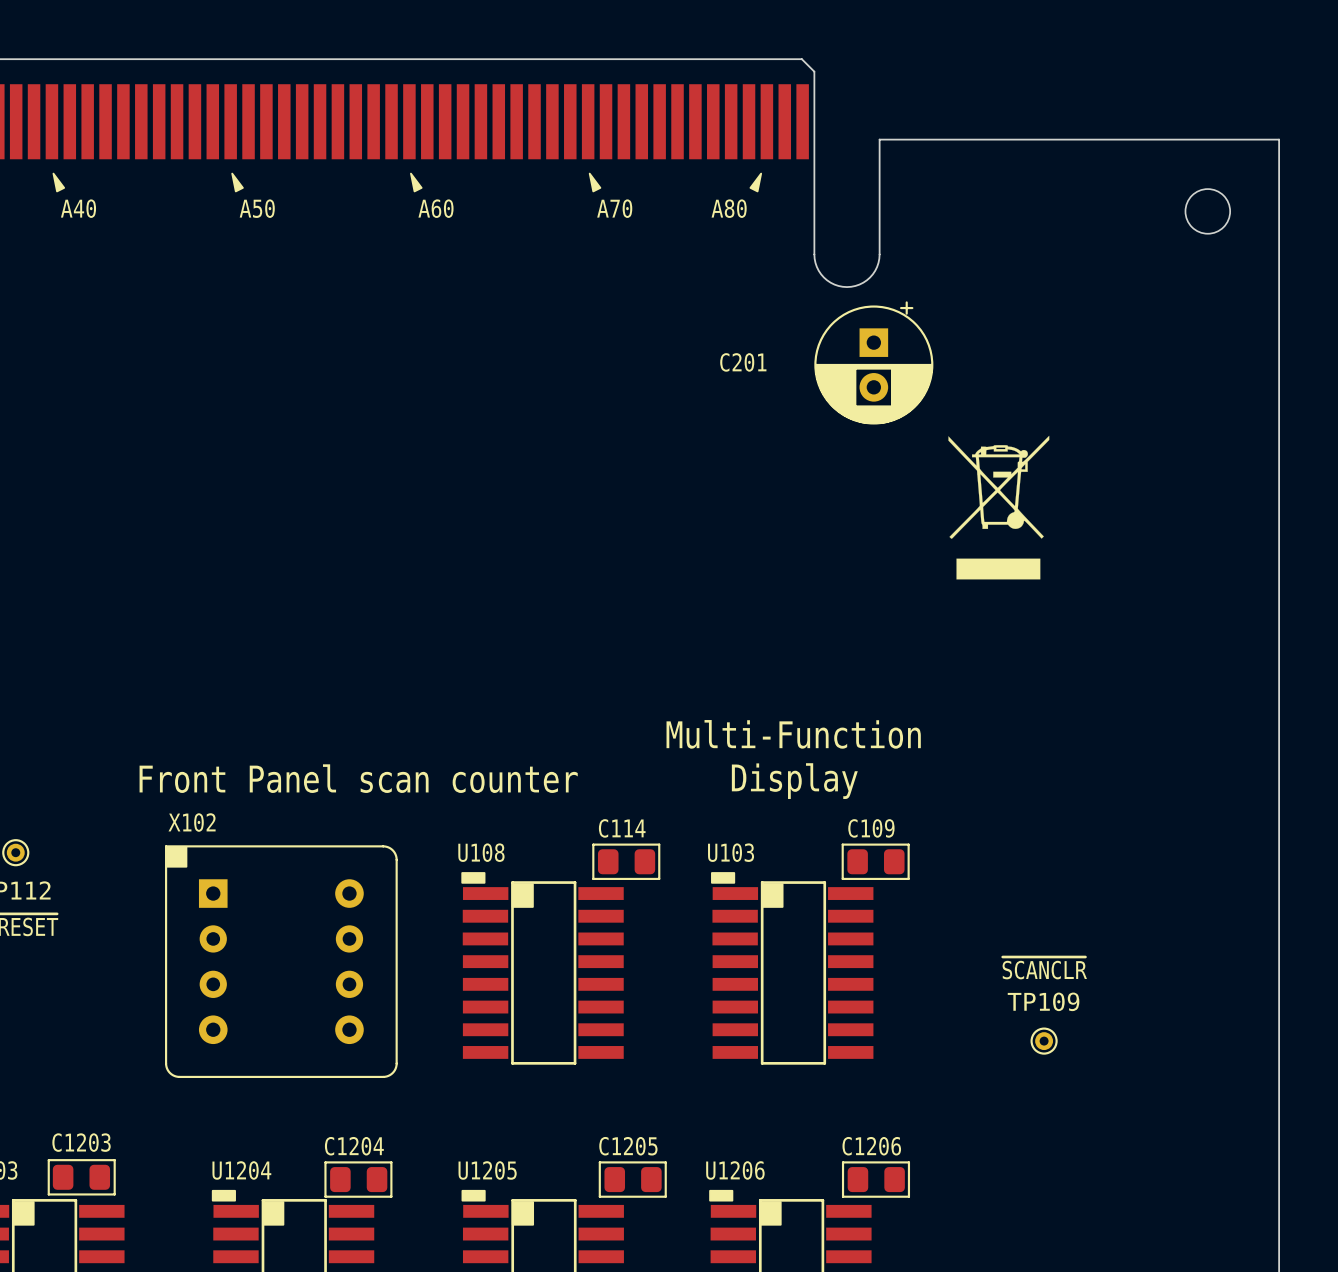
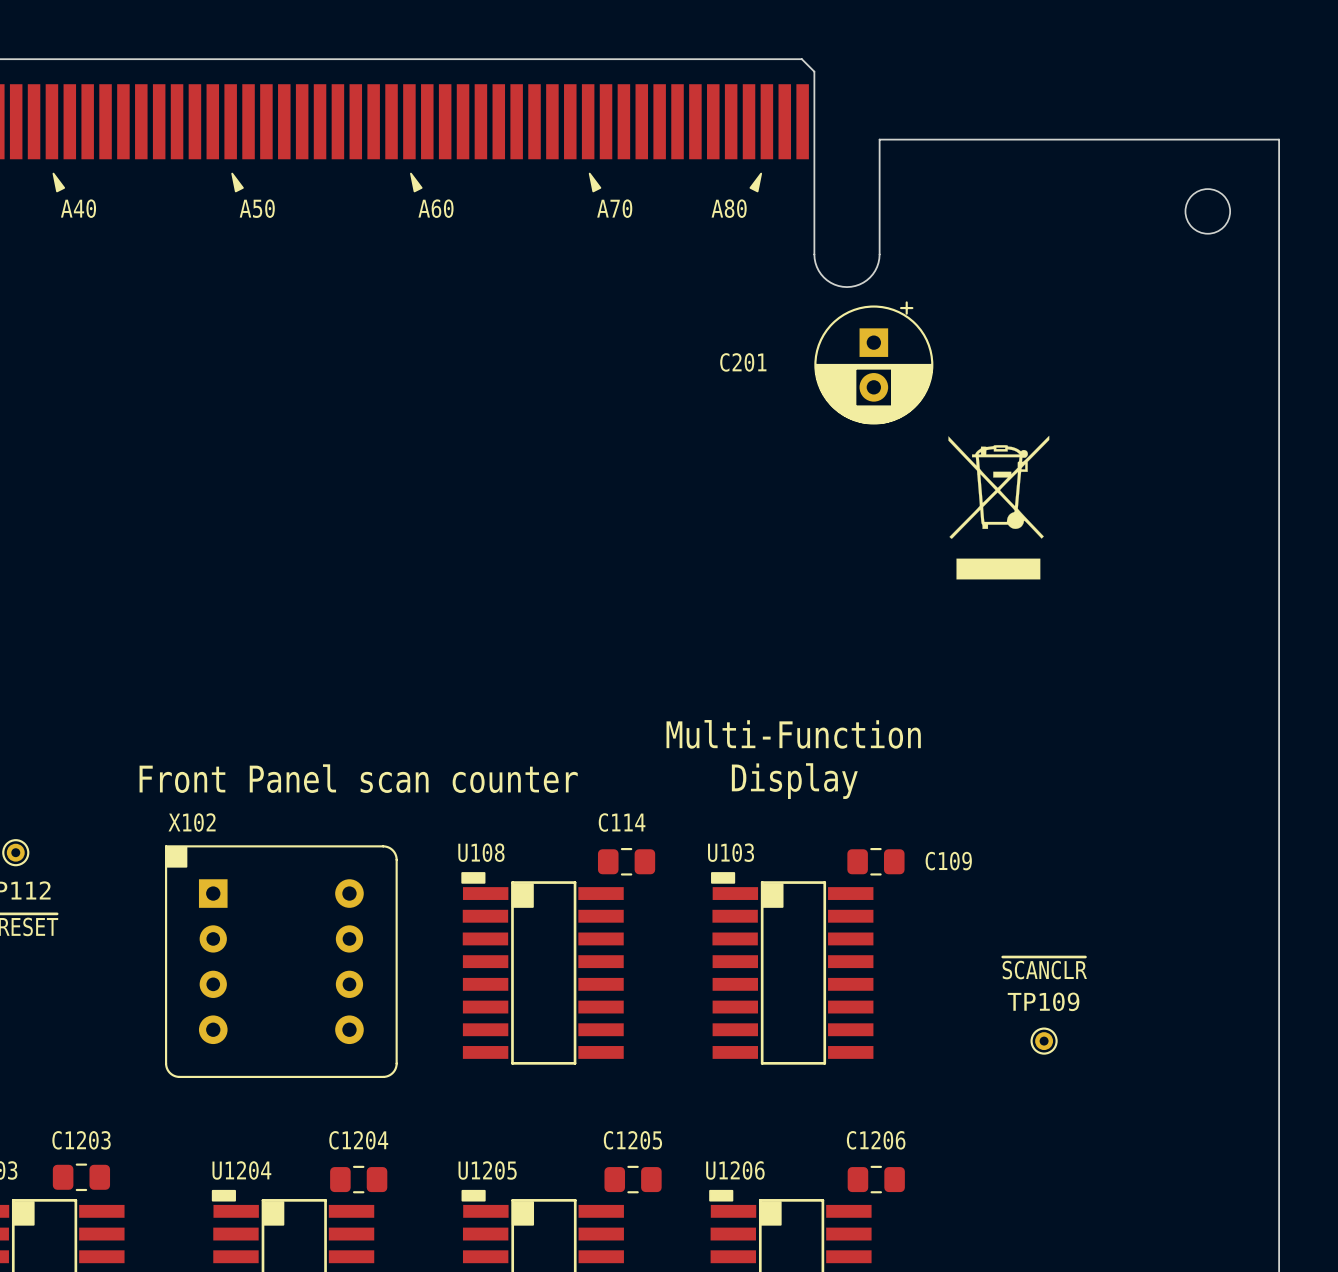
C109 name position: C109 (871, 828) -> C109 (948, 861)
C114 footprint: [592, 843, 661, 880] -> [597, 848, 656, 876]
C109 footprint: [841, 843, 910, 880] -> [847, 848, 905, 876]
C1203 footprint: [47, 1159, 116, 1196] -> [52, 1163, 111, 1192]
C1204 footprint: [324, 1161, 393, 1198] -> [330, 1165, 388, 1194]
C1205 footprint: [598, 1161, 667, 1198] -> [604, 1165, 662, 1194]
C1206 footprint: [841, 1161, 911, 1198] -> [847, 1165, 905, 1194]

